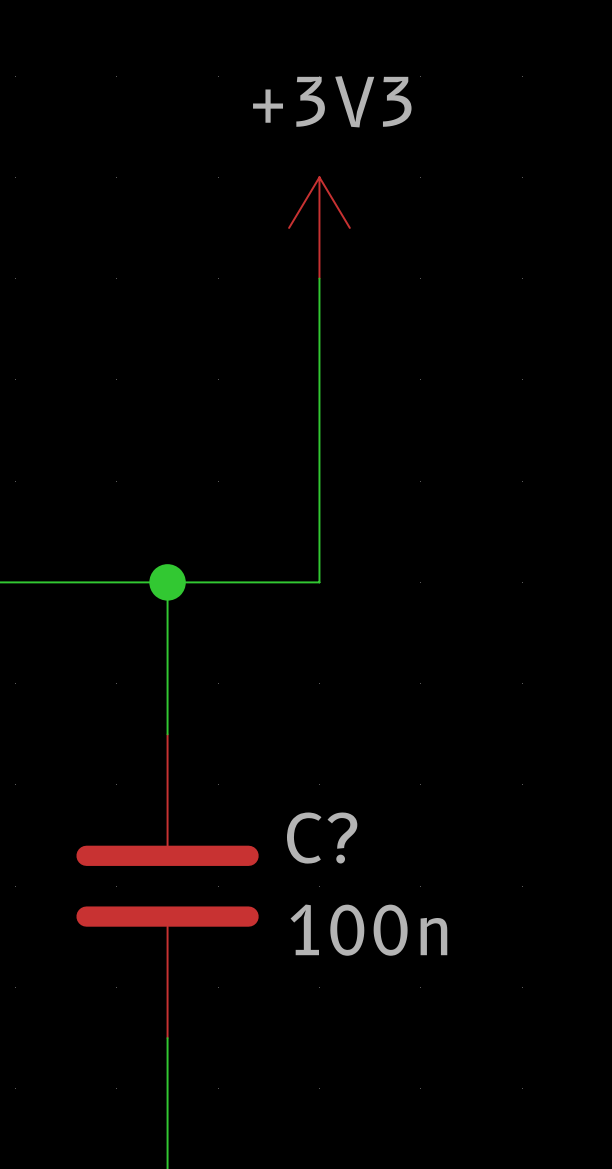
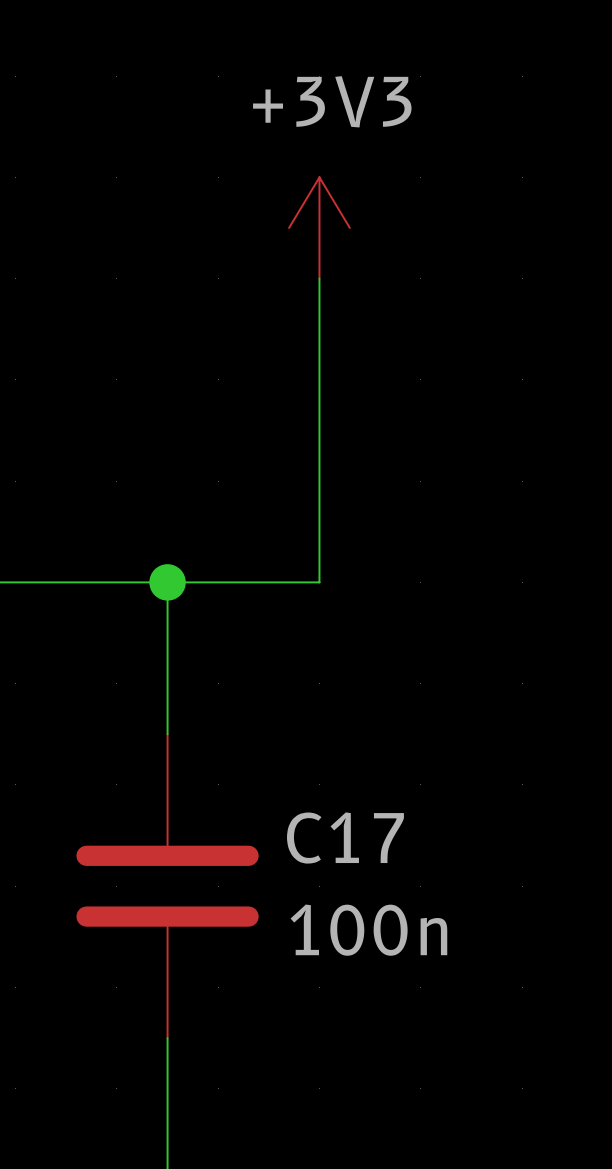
C? name: C? (322, 838) -> C17 (345, 838)

